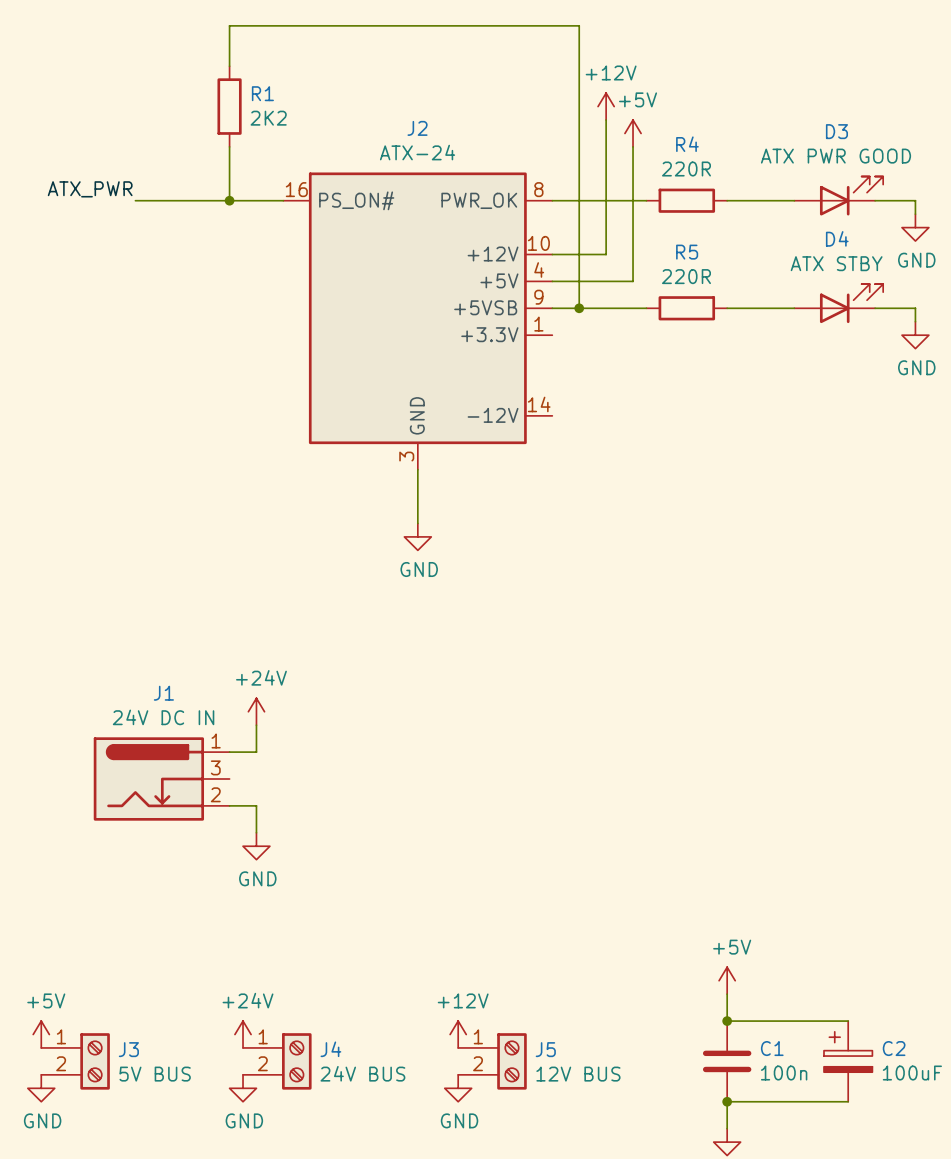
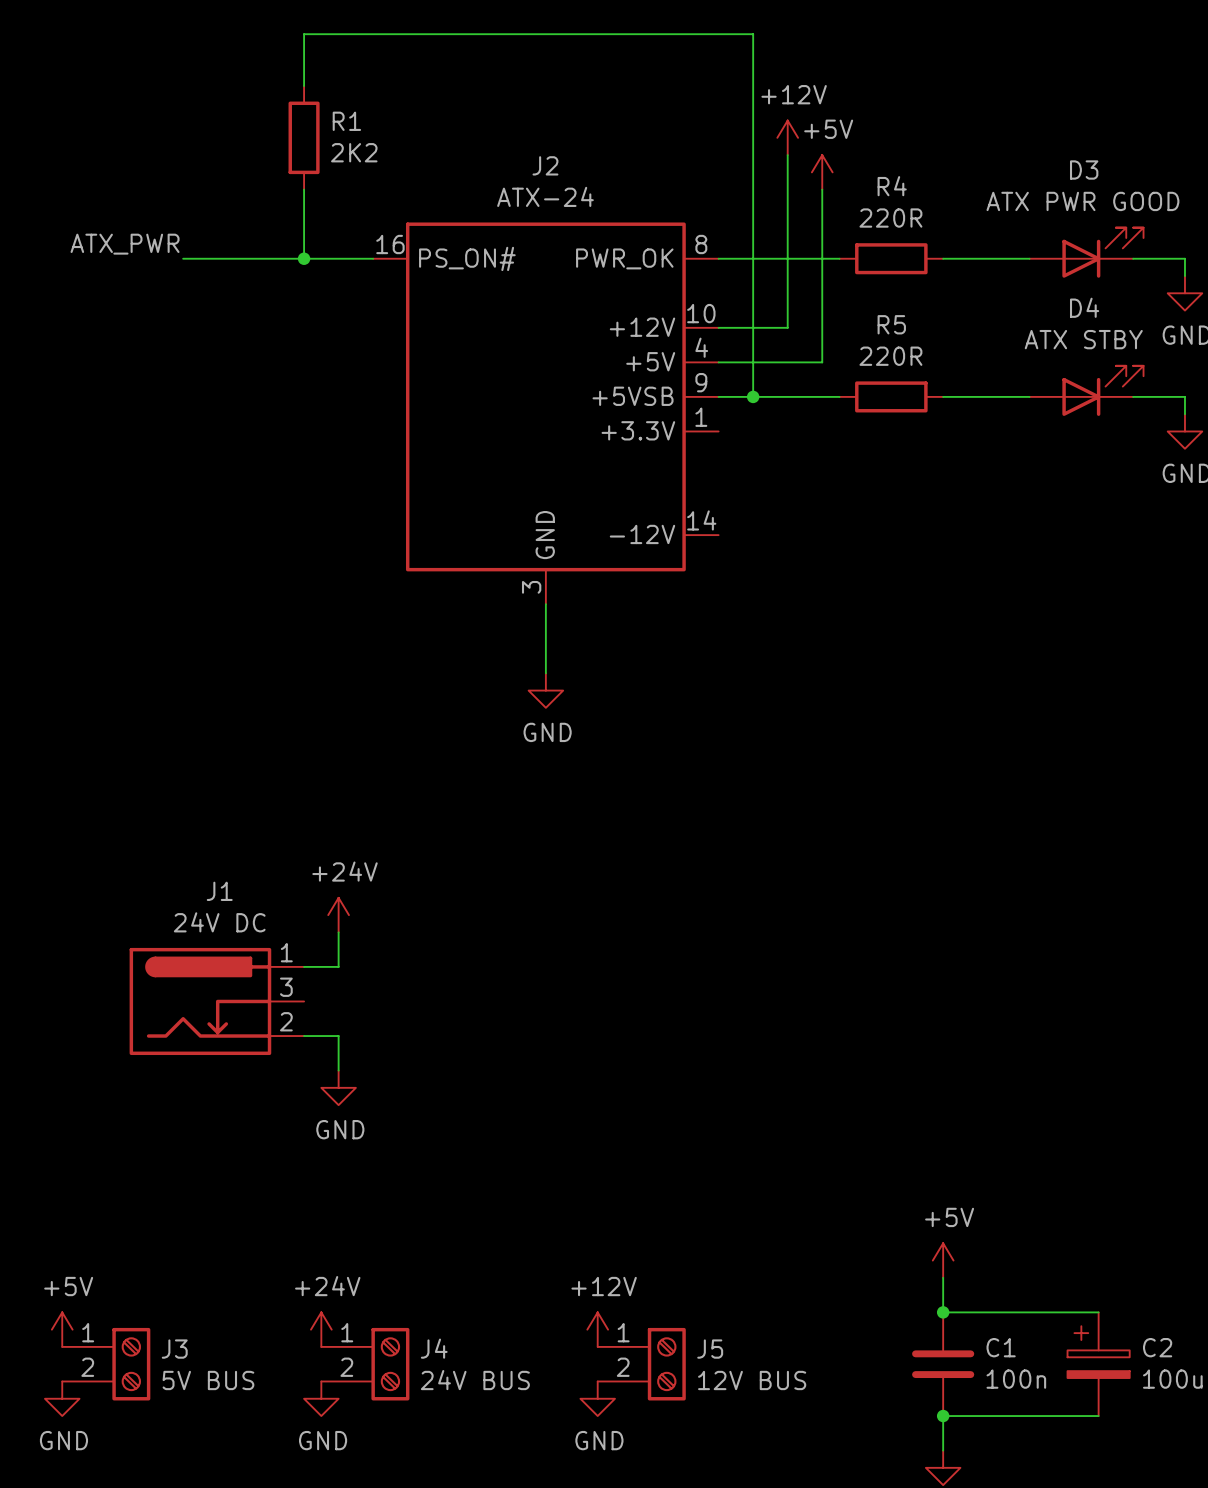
J1 value: 24V DC IN (163, 717) -> 24V DC (219, 922)

